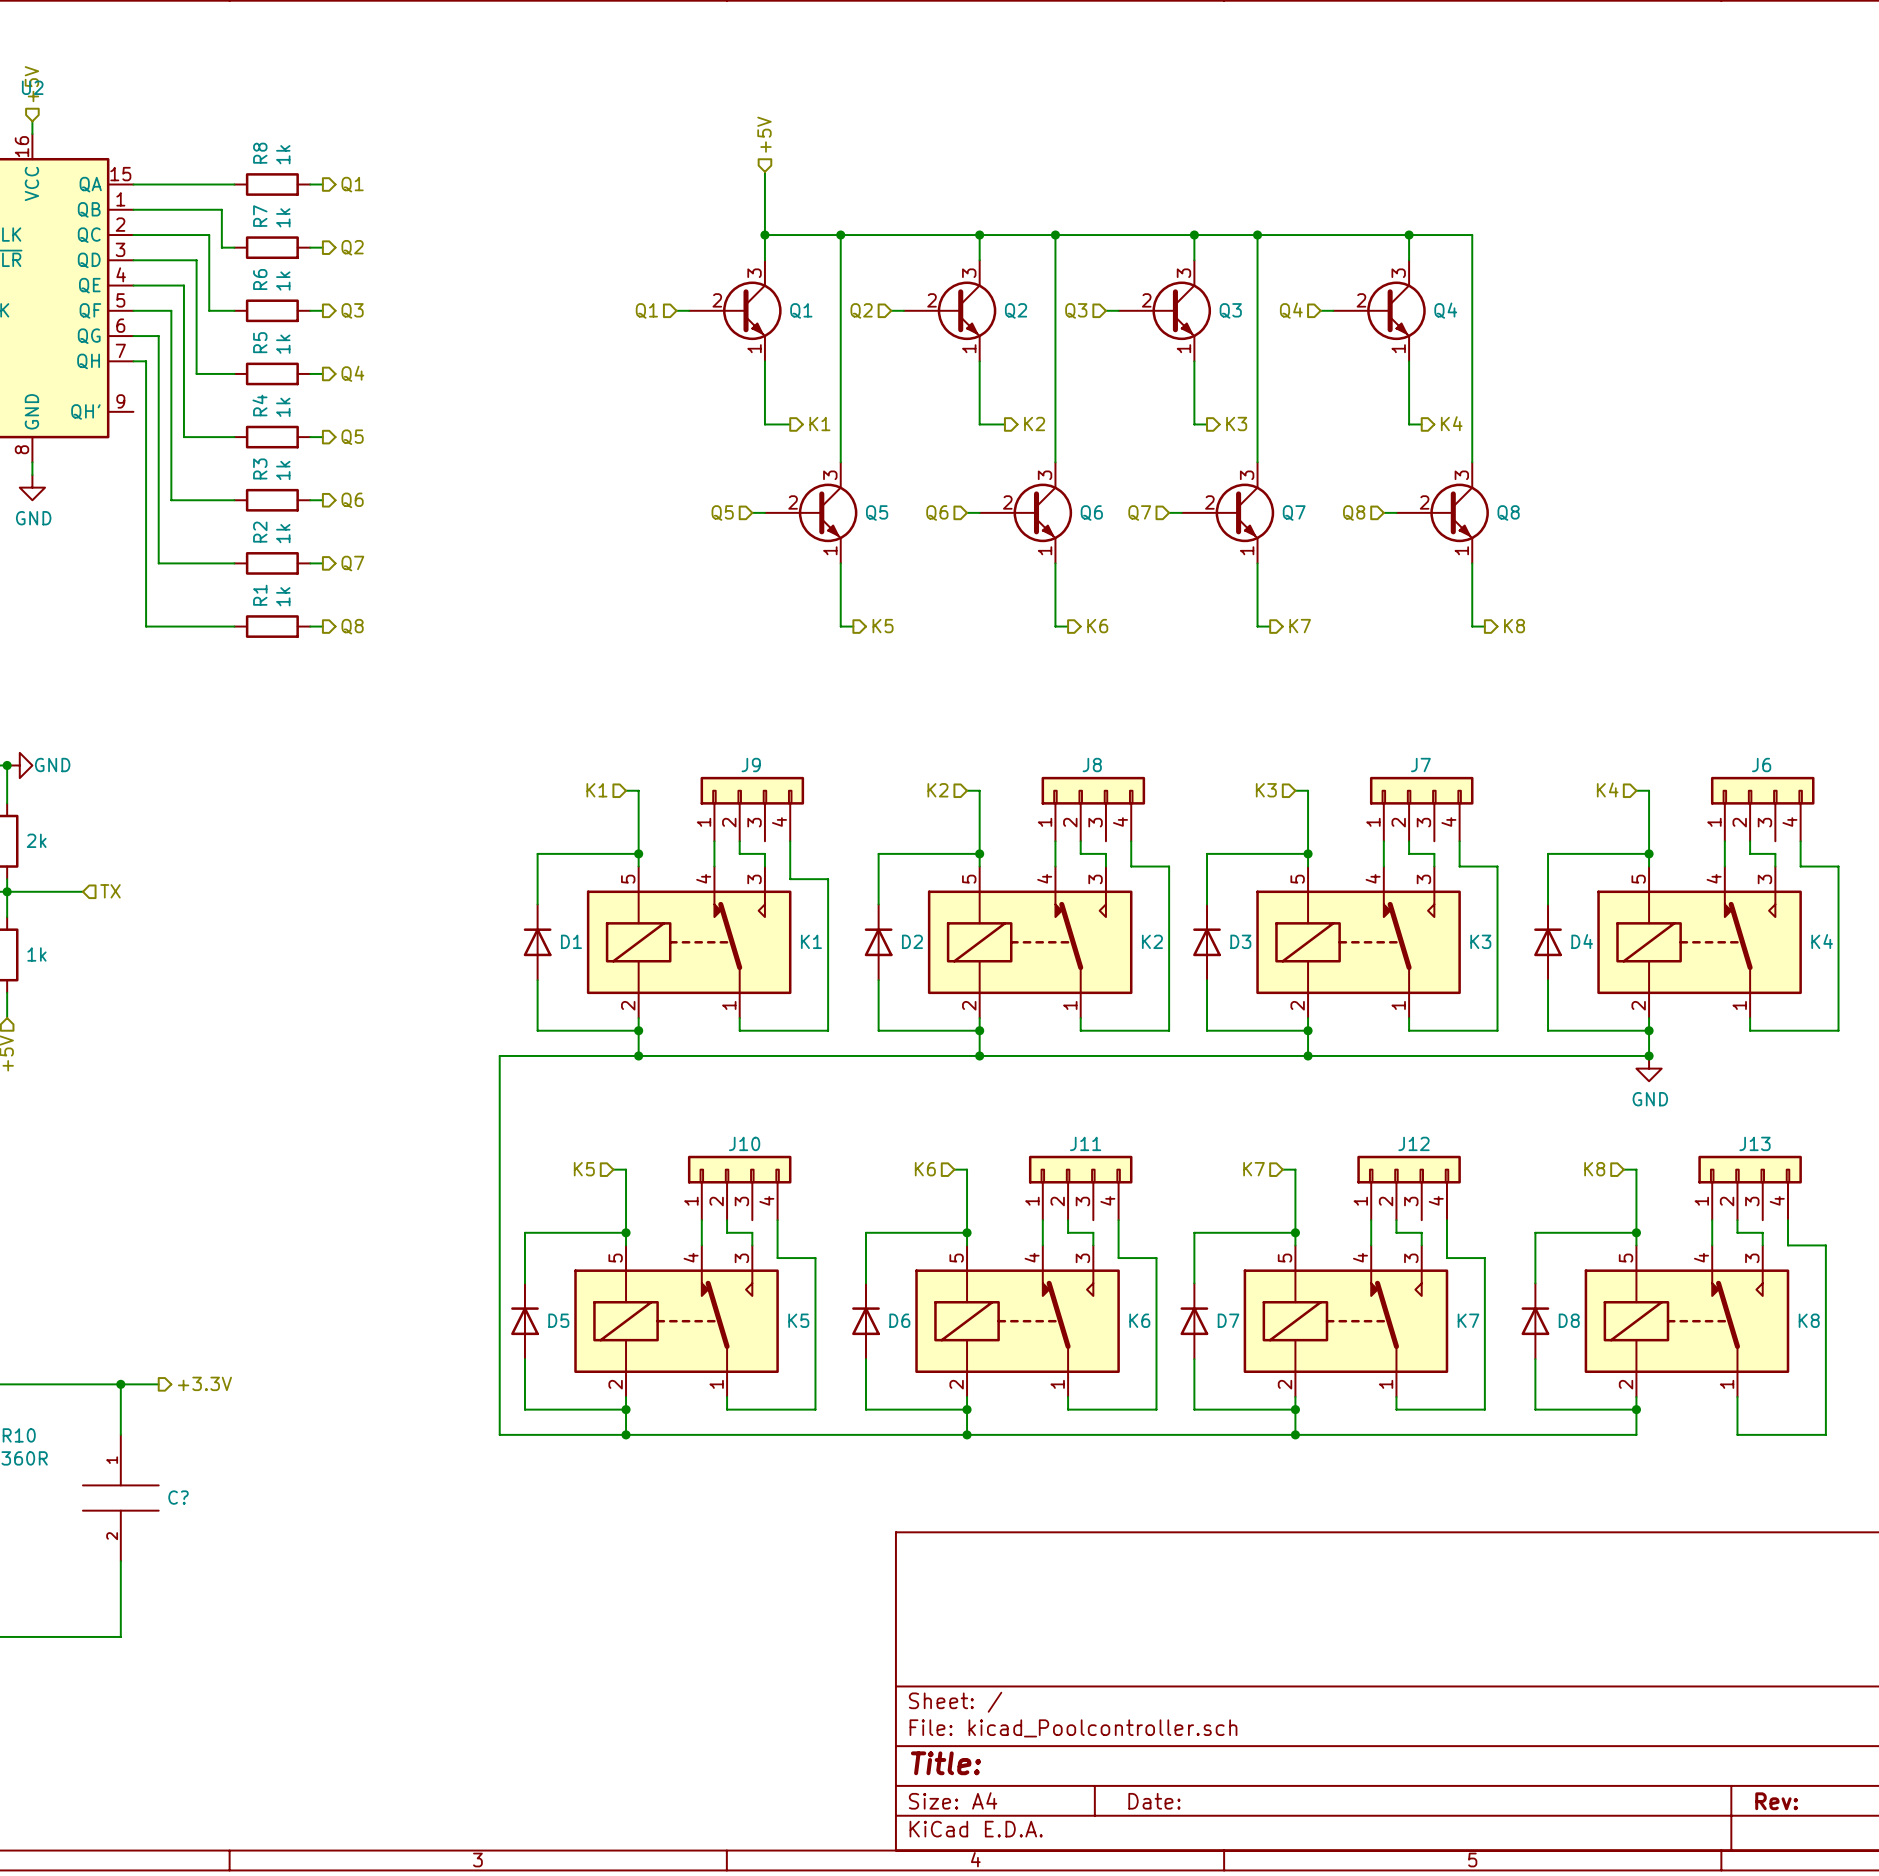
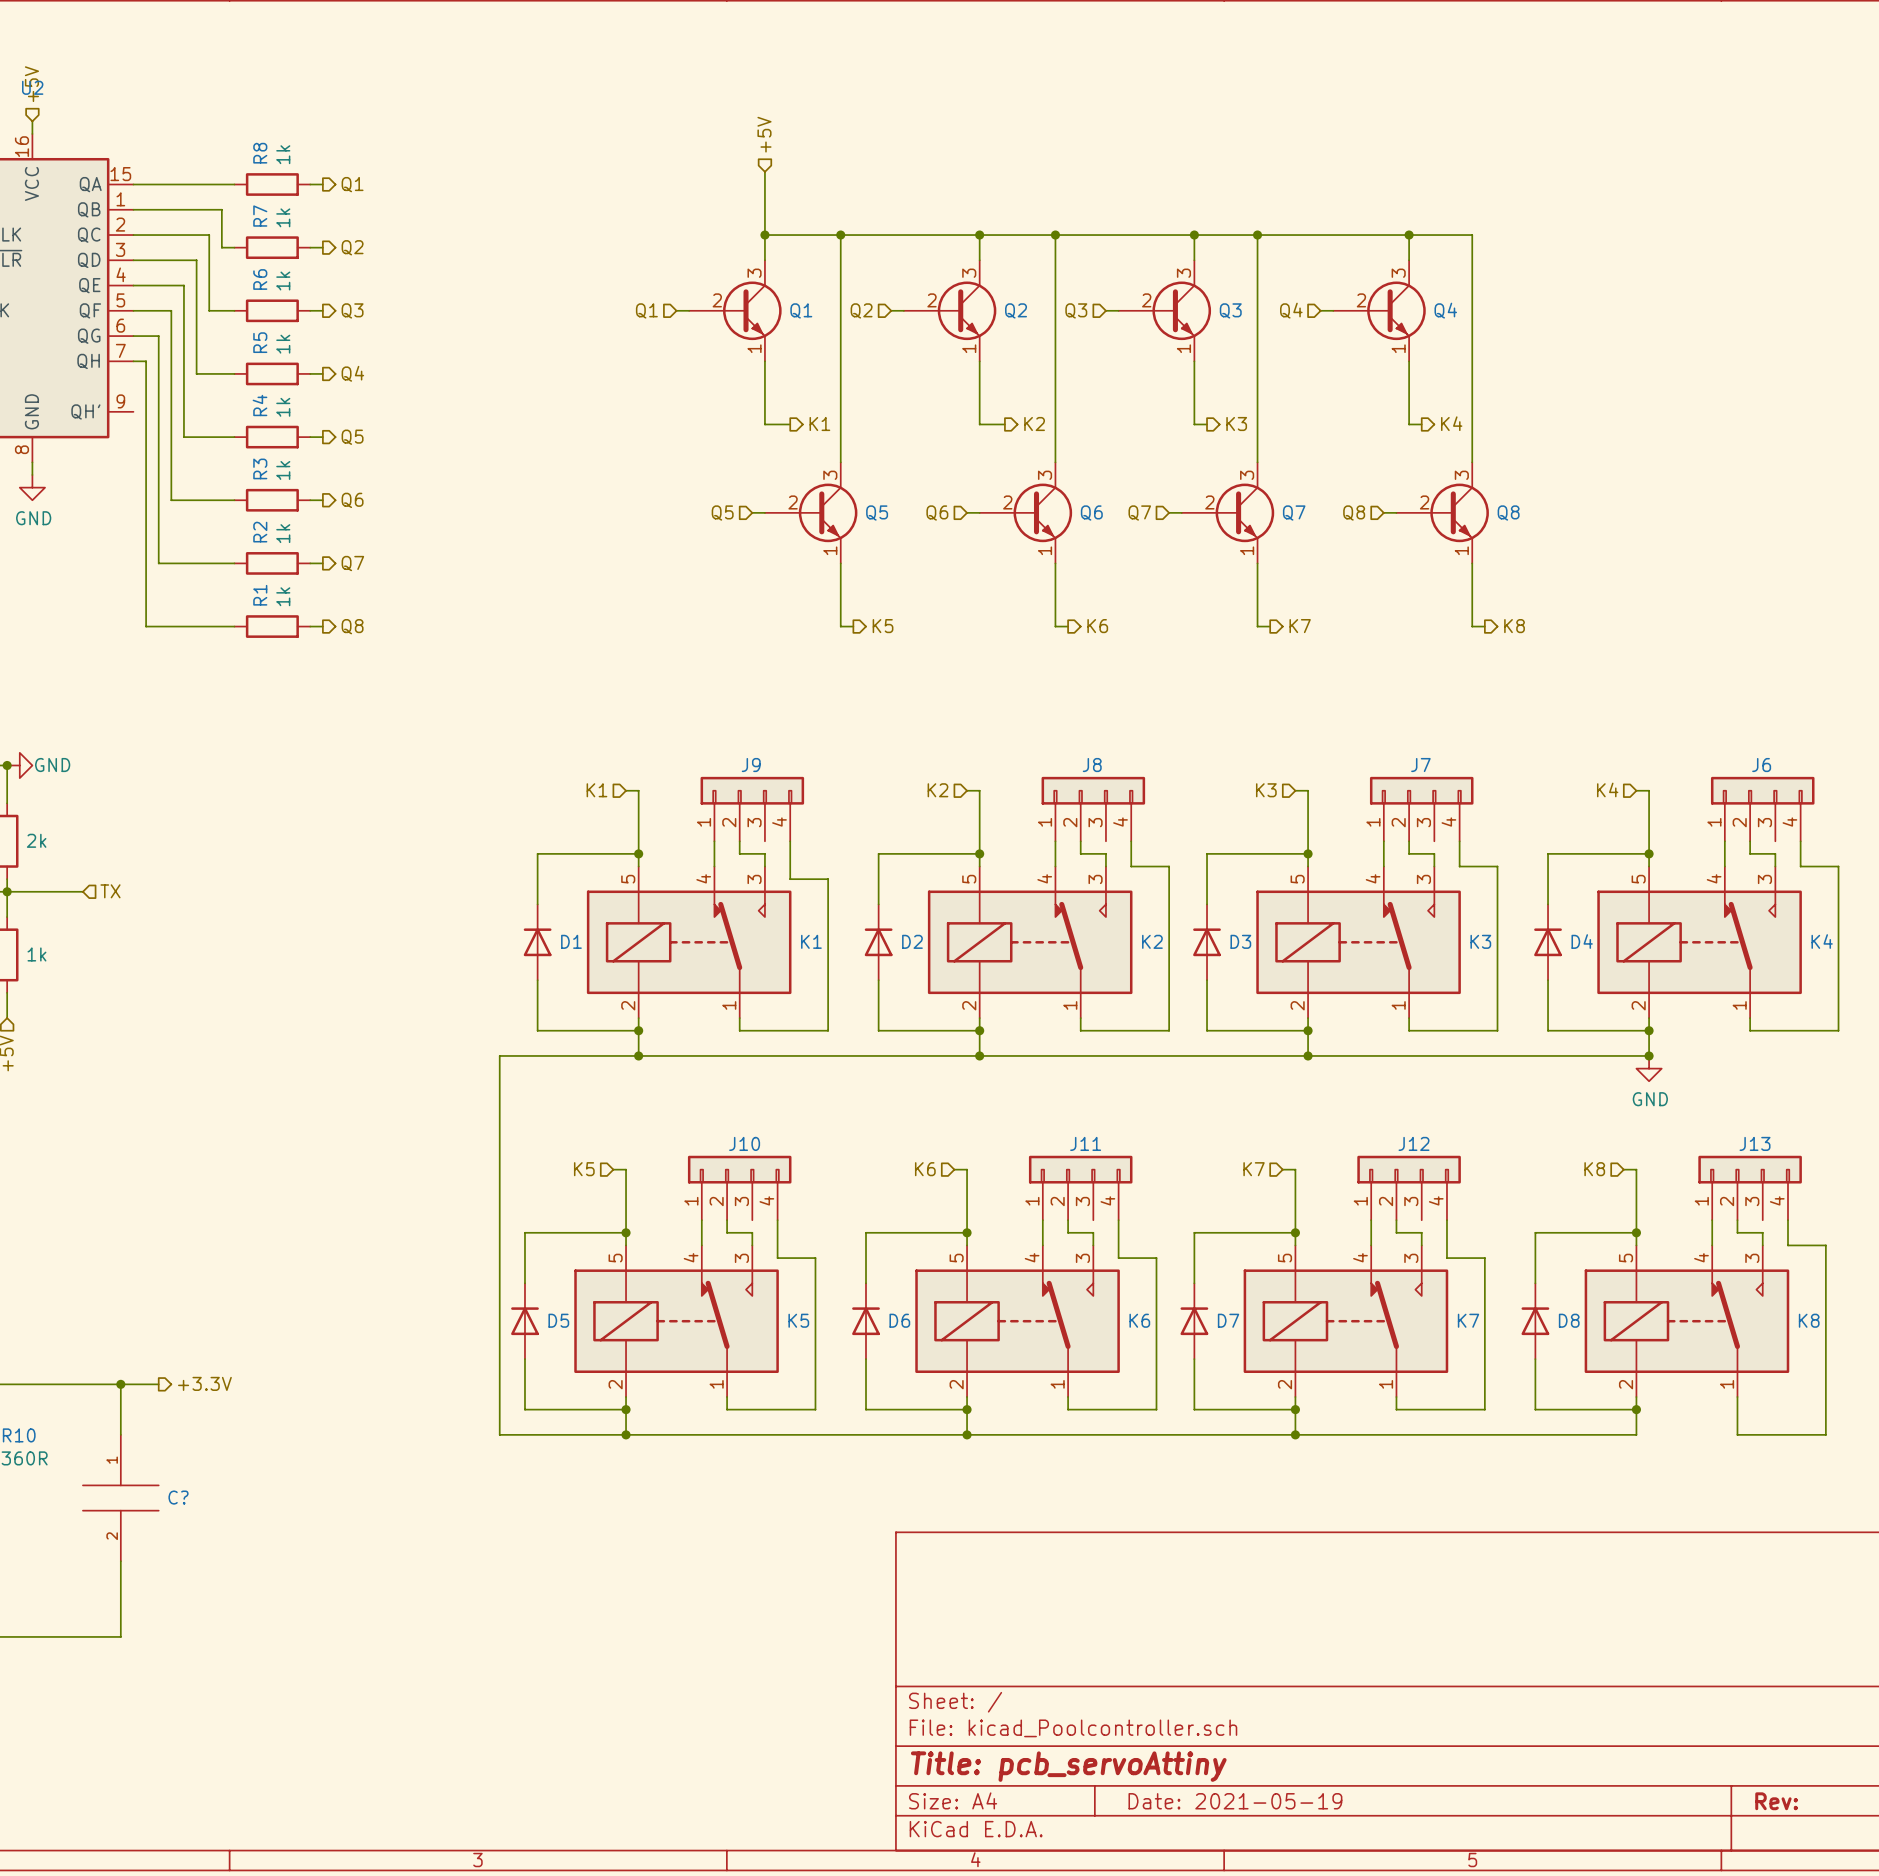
title block: Title: (945, 1763) -> Title: pcb_servoAttiny (1068, 1766)
title block: Date: (1154, 1801) -> Date: 2021-05-19 (1235, 1801)

